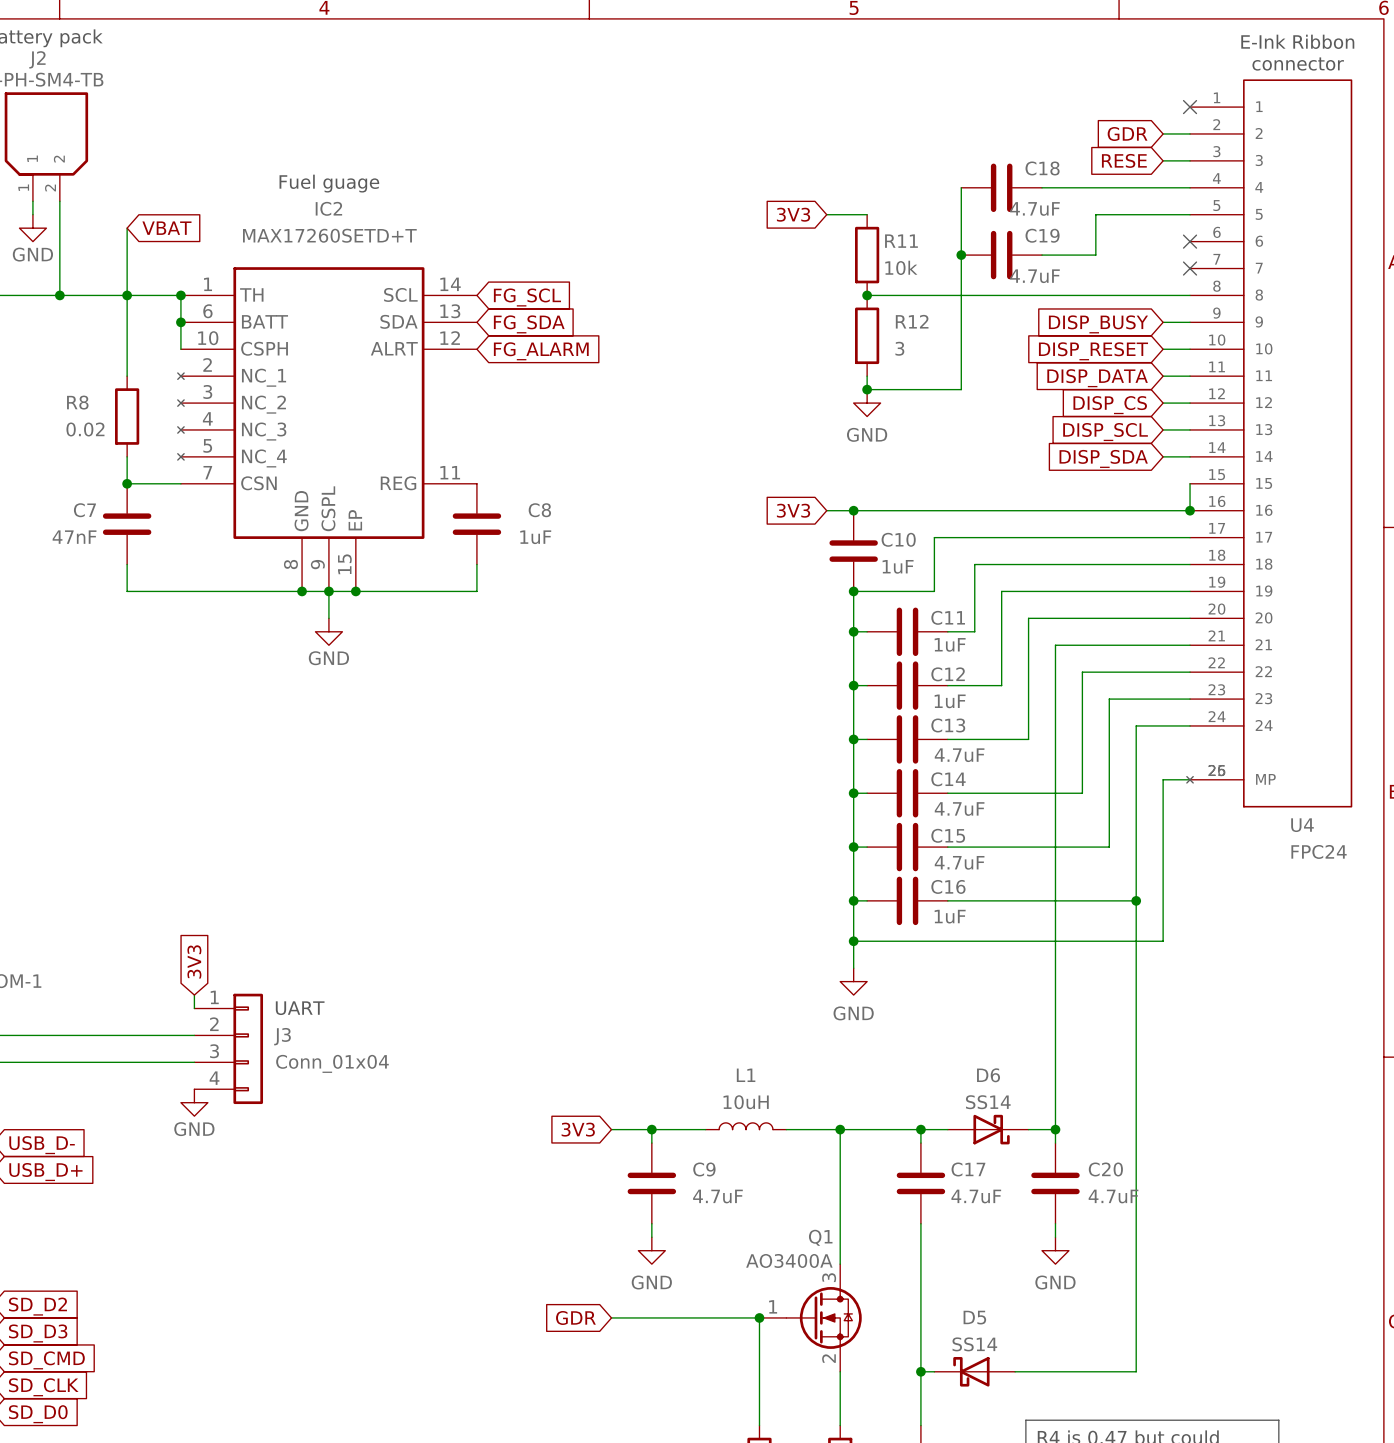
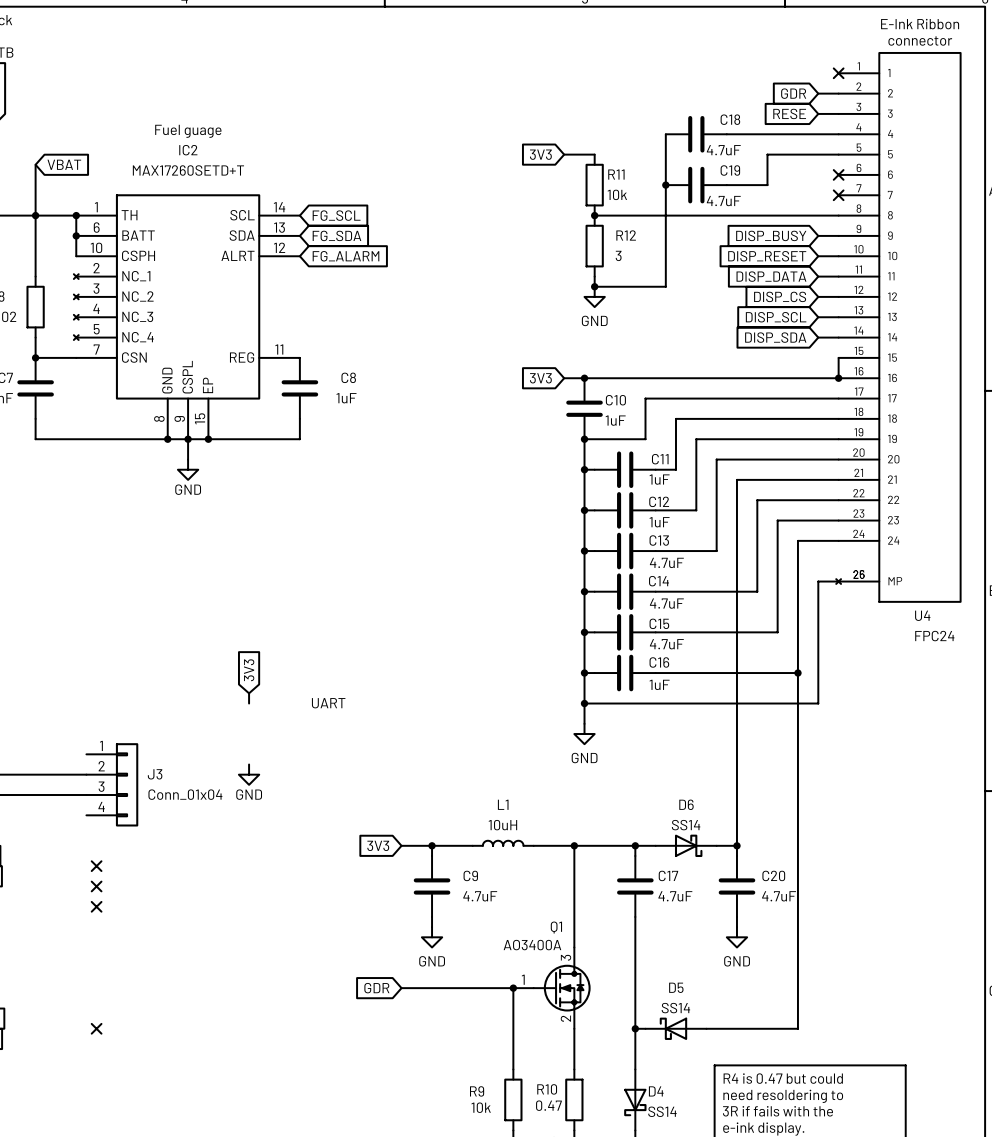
global label position: 3V3 (194, 961) -> 3V3 (249, 670)
wire: (194, 995) (194, 1008) -> (249, 693) (249, 703)
text position: UART (300, 1008) -> UART (328, 703)
power symbol: none -> GND (249, 774)
power symbol: GND (194, 1102) -> none
no-connect mark: none -> (96, 866)
no-connect mark: none -> (96, 886)
no-connect mark: none -> (96, 906)
no-connect mark: none -> (96, 1028)

